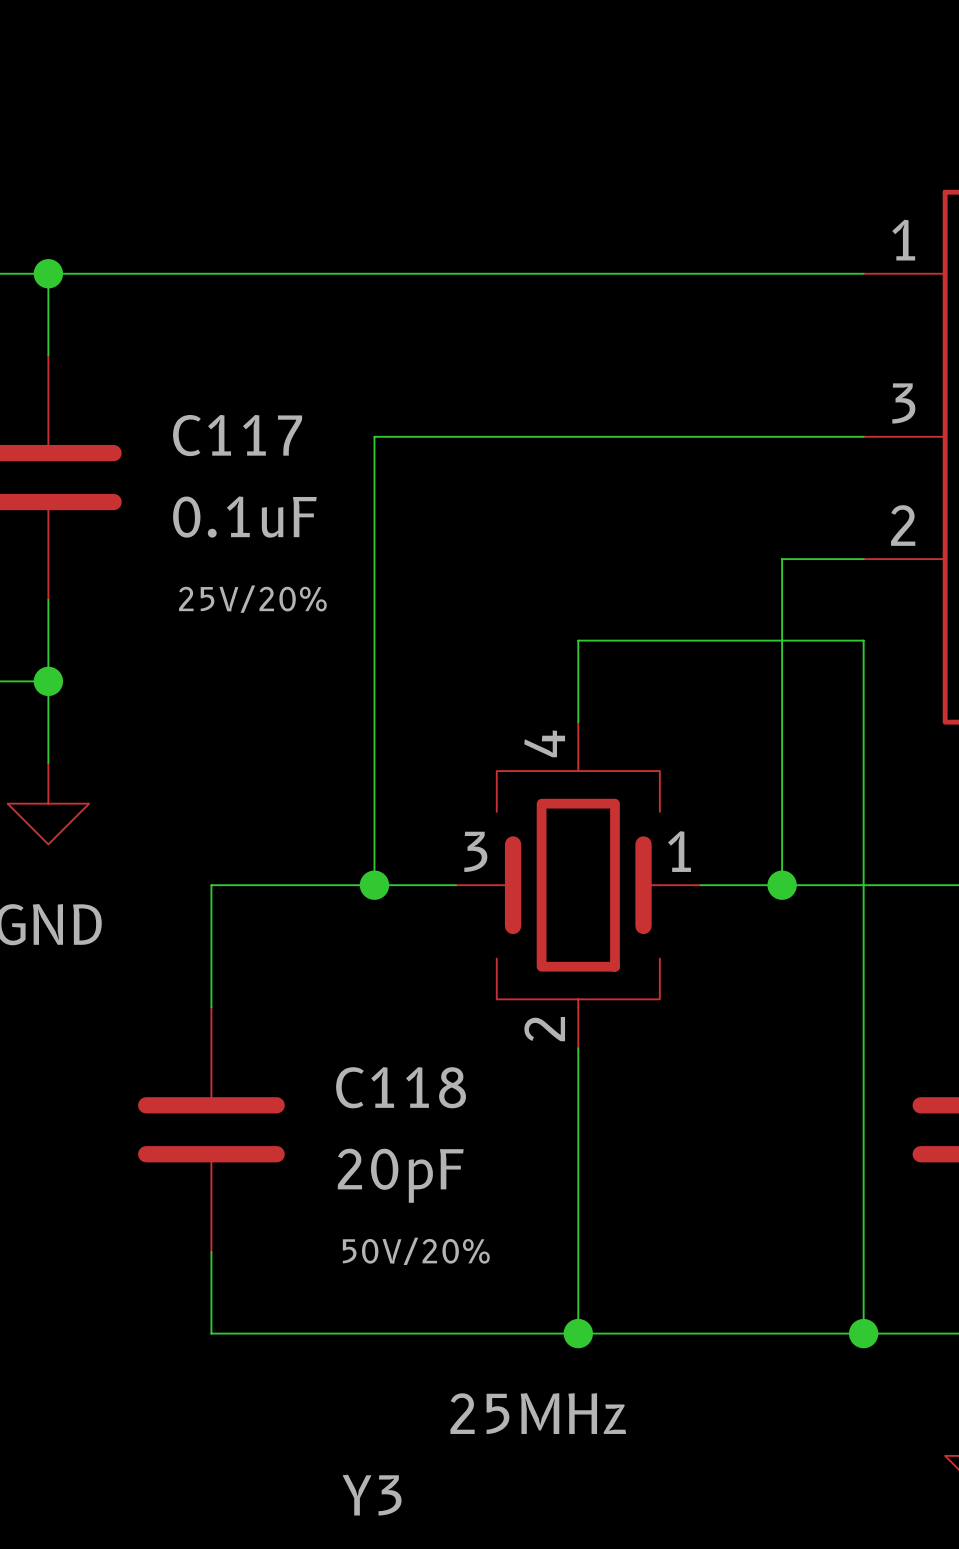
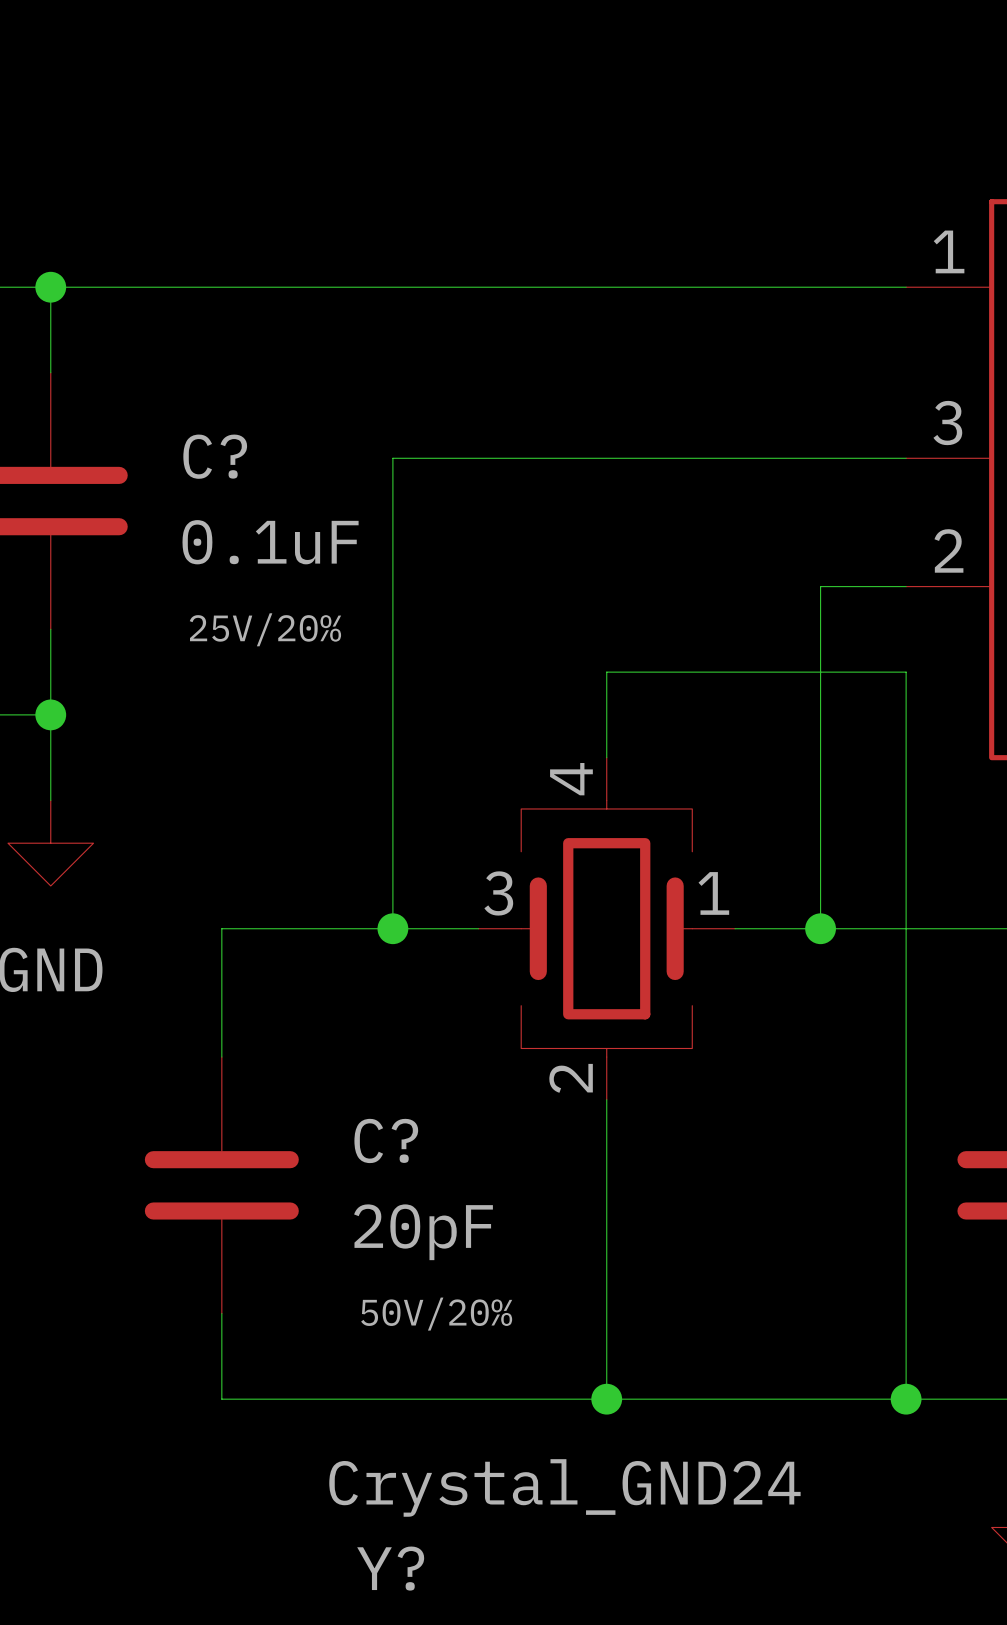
C117 name: C117 (237, 435) -> C? (215, 456)
C118 name: C118 (401, 1087) -> C? (386, 1140)
Y3 value: 25MHz (538, 1413) -> Crystal_GND24 (564, 1487)
Y3 name: Y3 (372, 1495) -> Y? (390, 1568)

